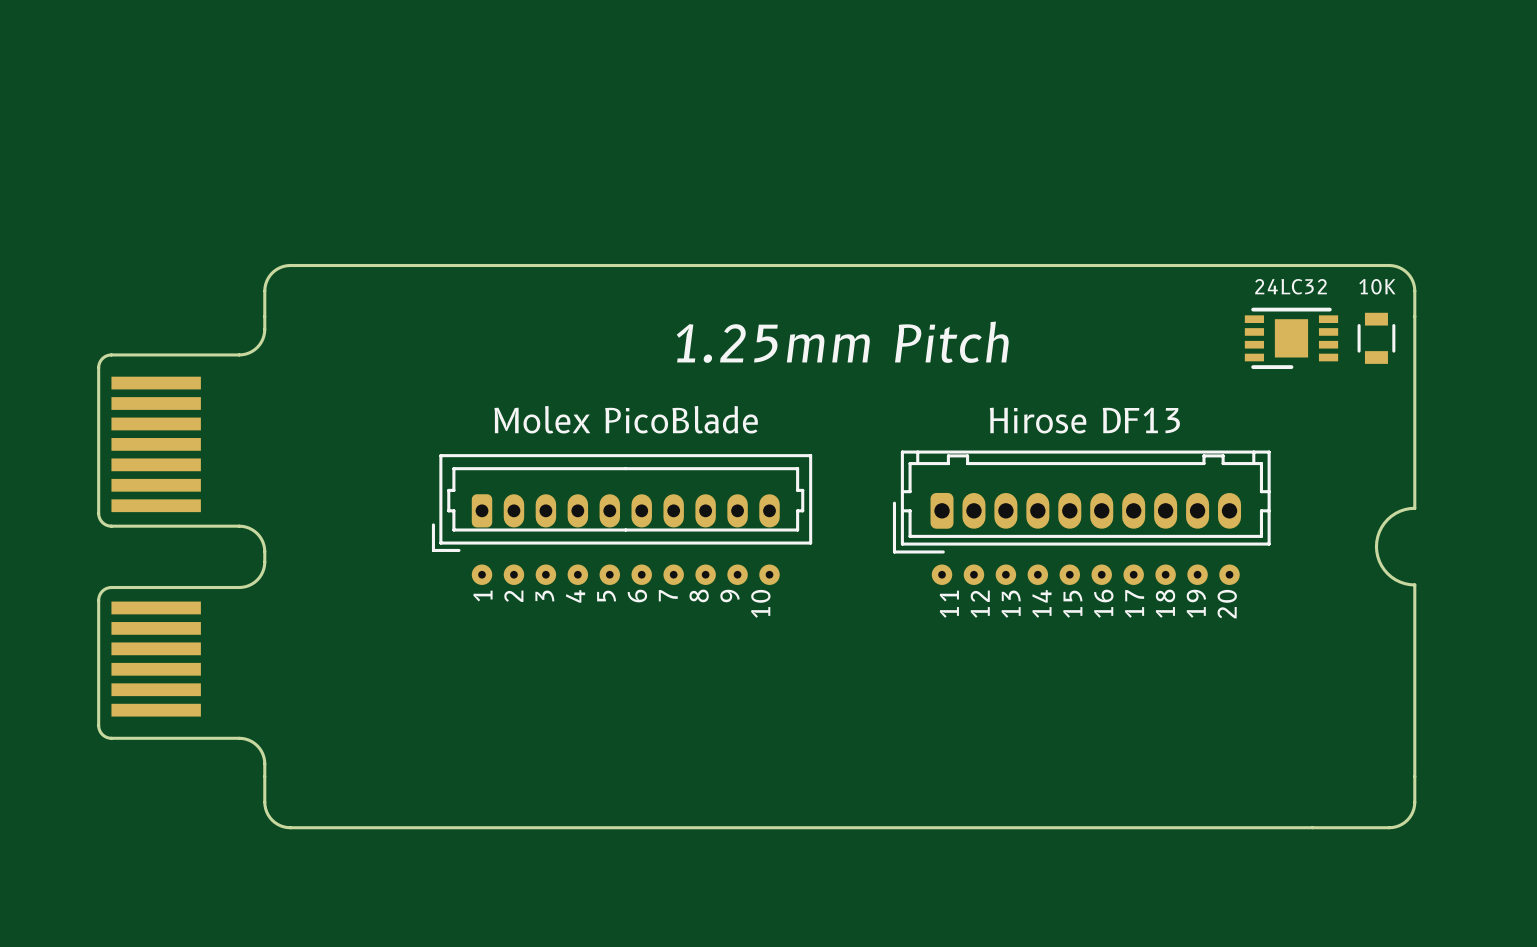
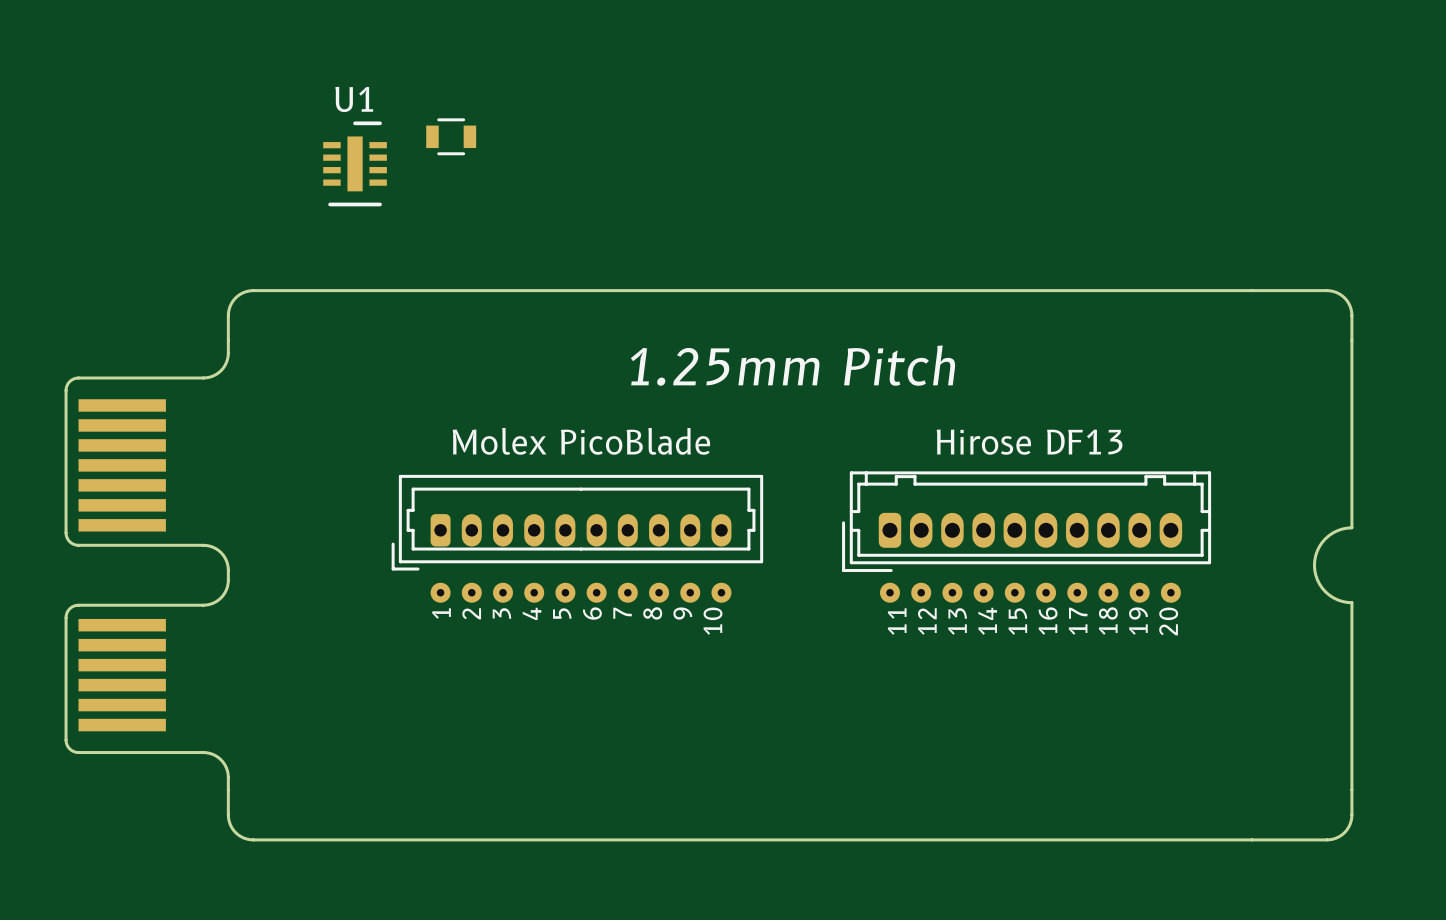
part: none -> (451, 136)
U1: none -> (355, 163)
part: 24LC32 (1291, 338) -> none
part: 10K (1376, 338) -> none

